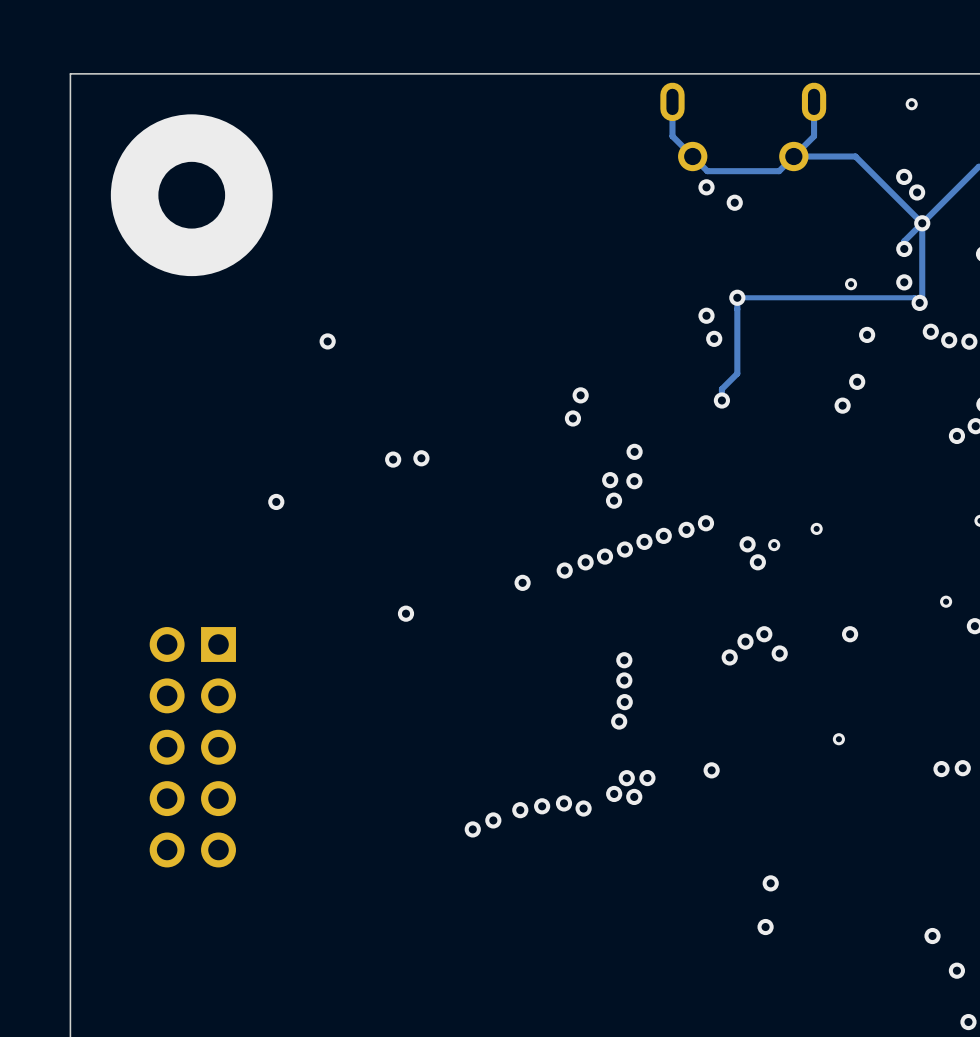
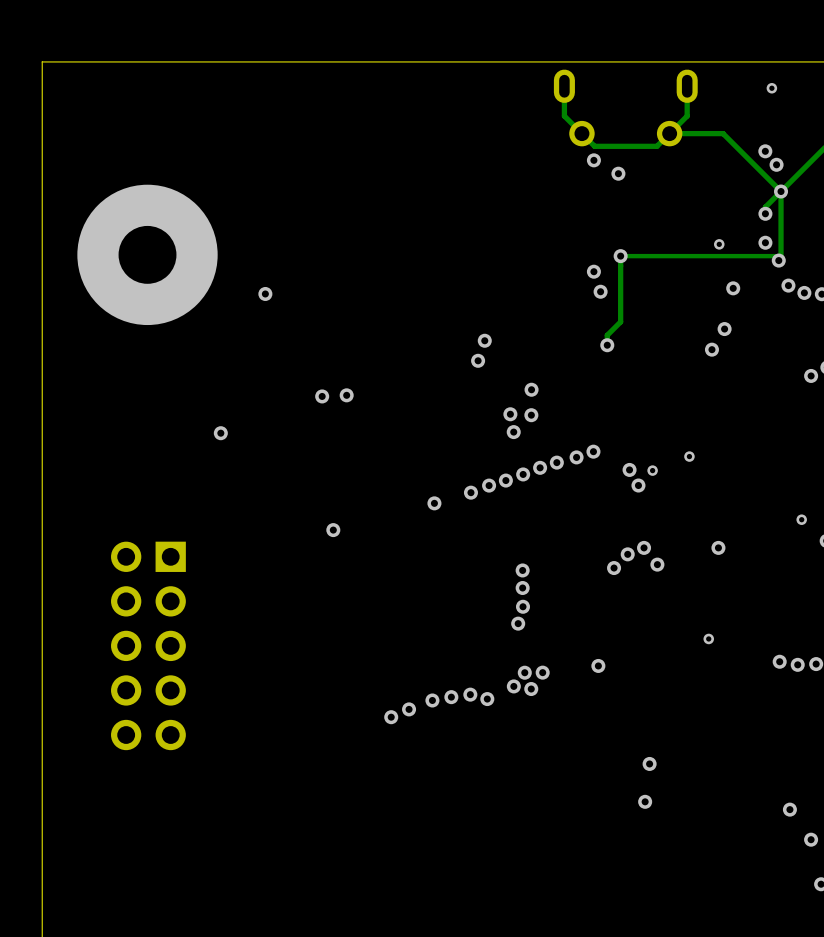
via position: (191, 195) -> (147, 254)
via: none -> (779, 661)

